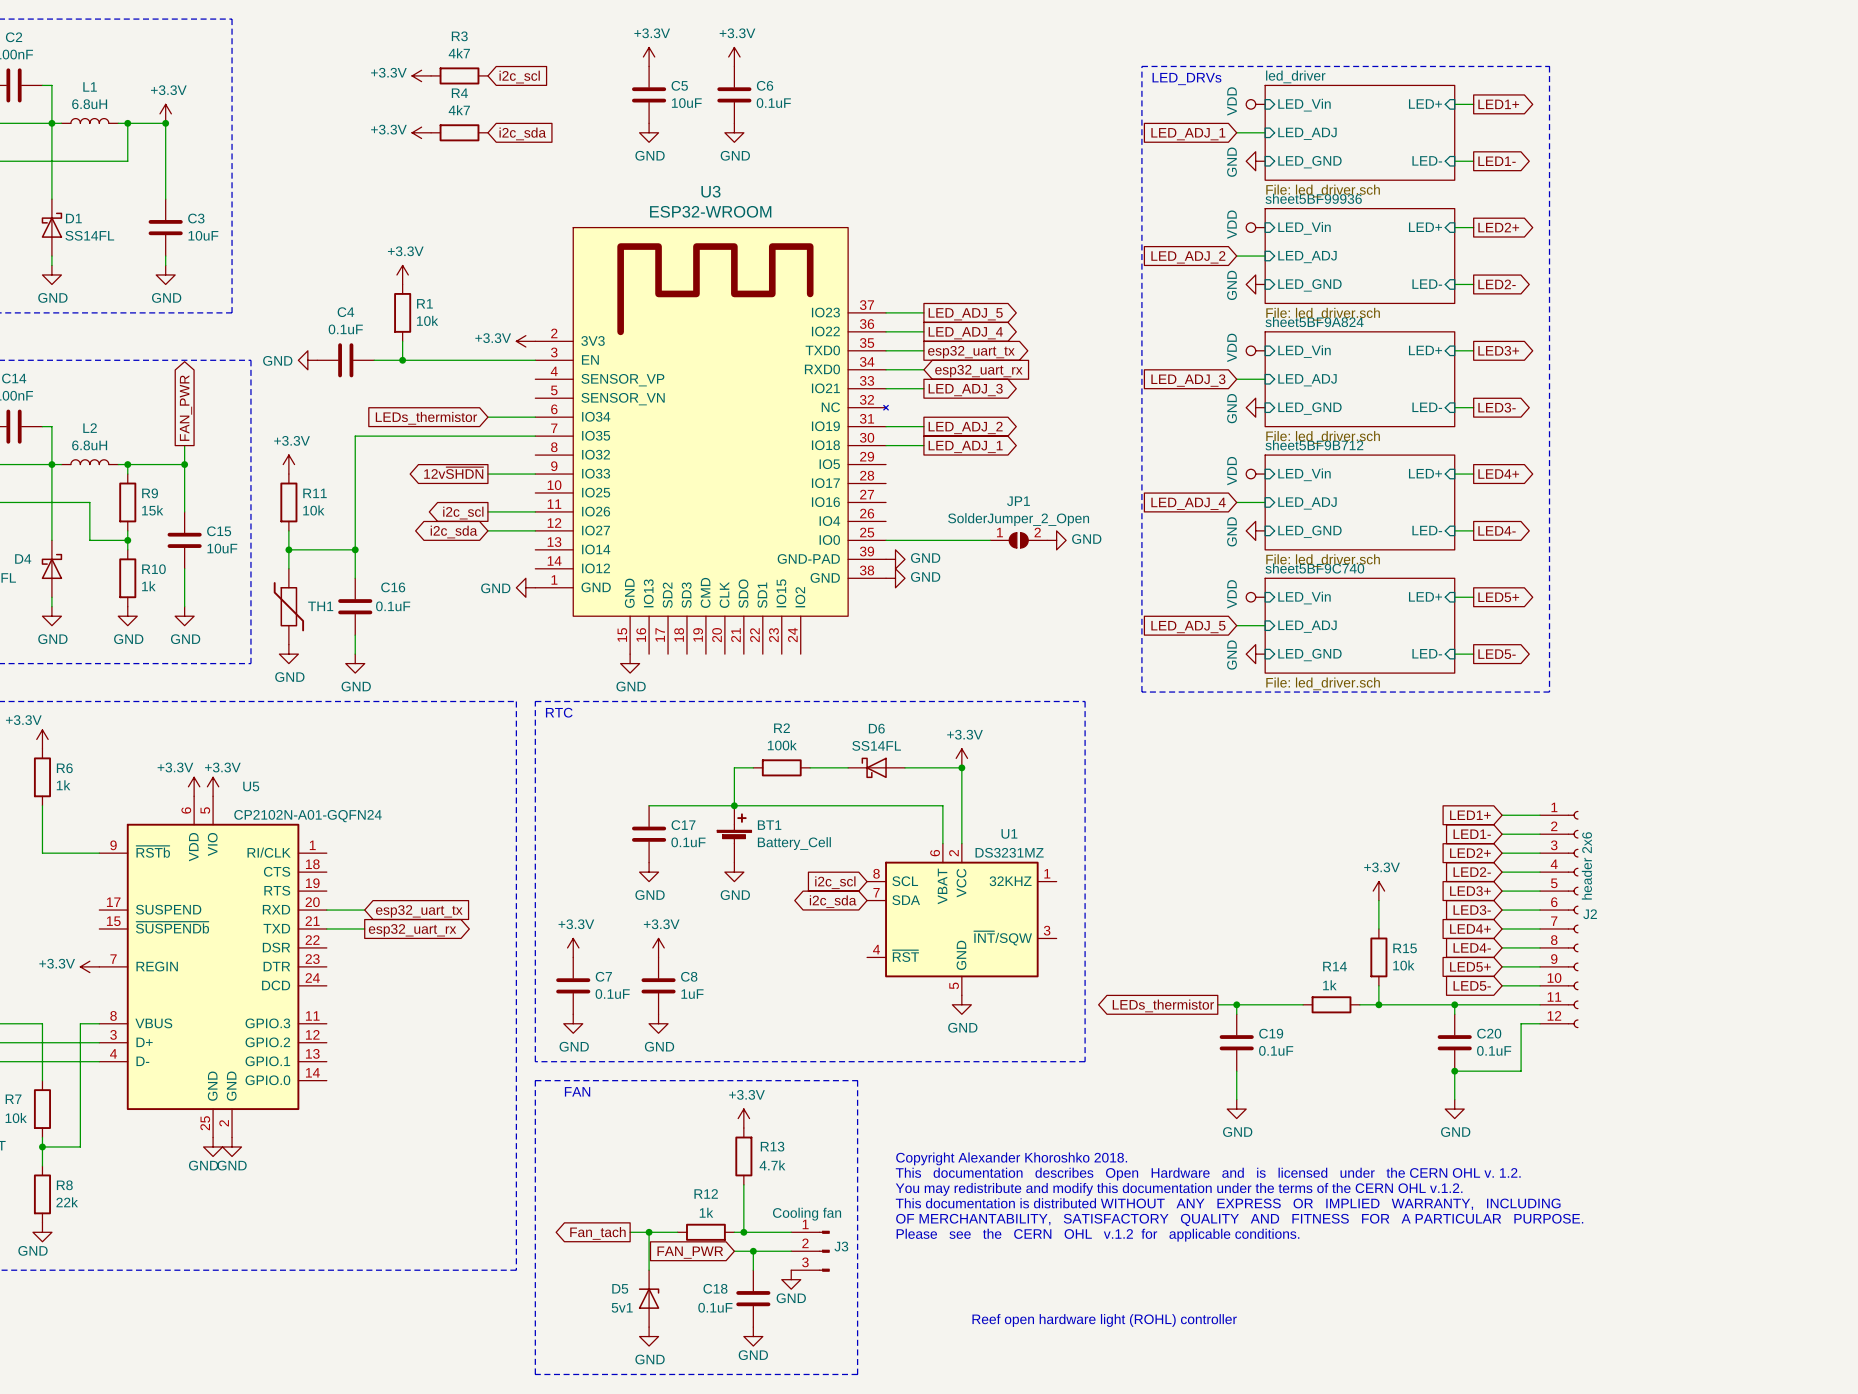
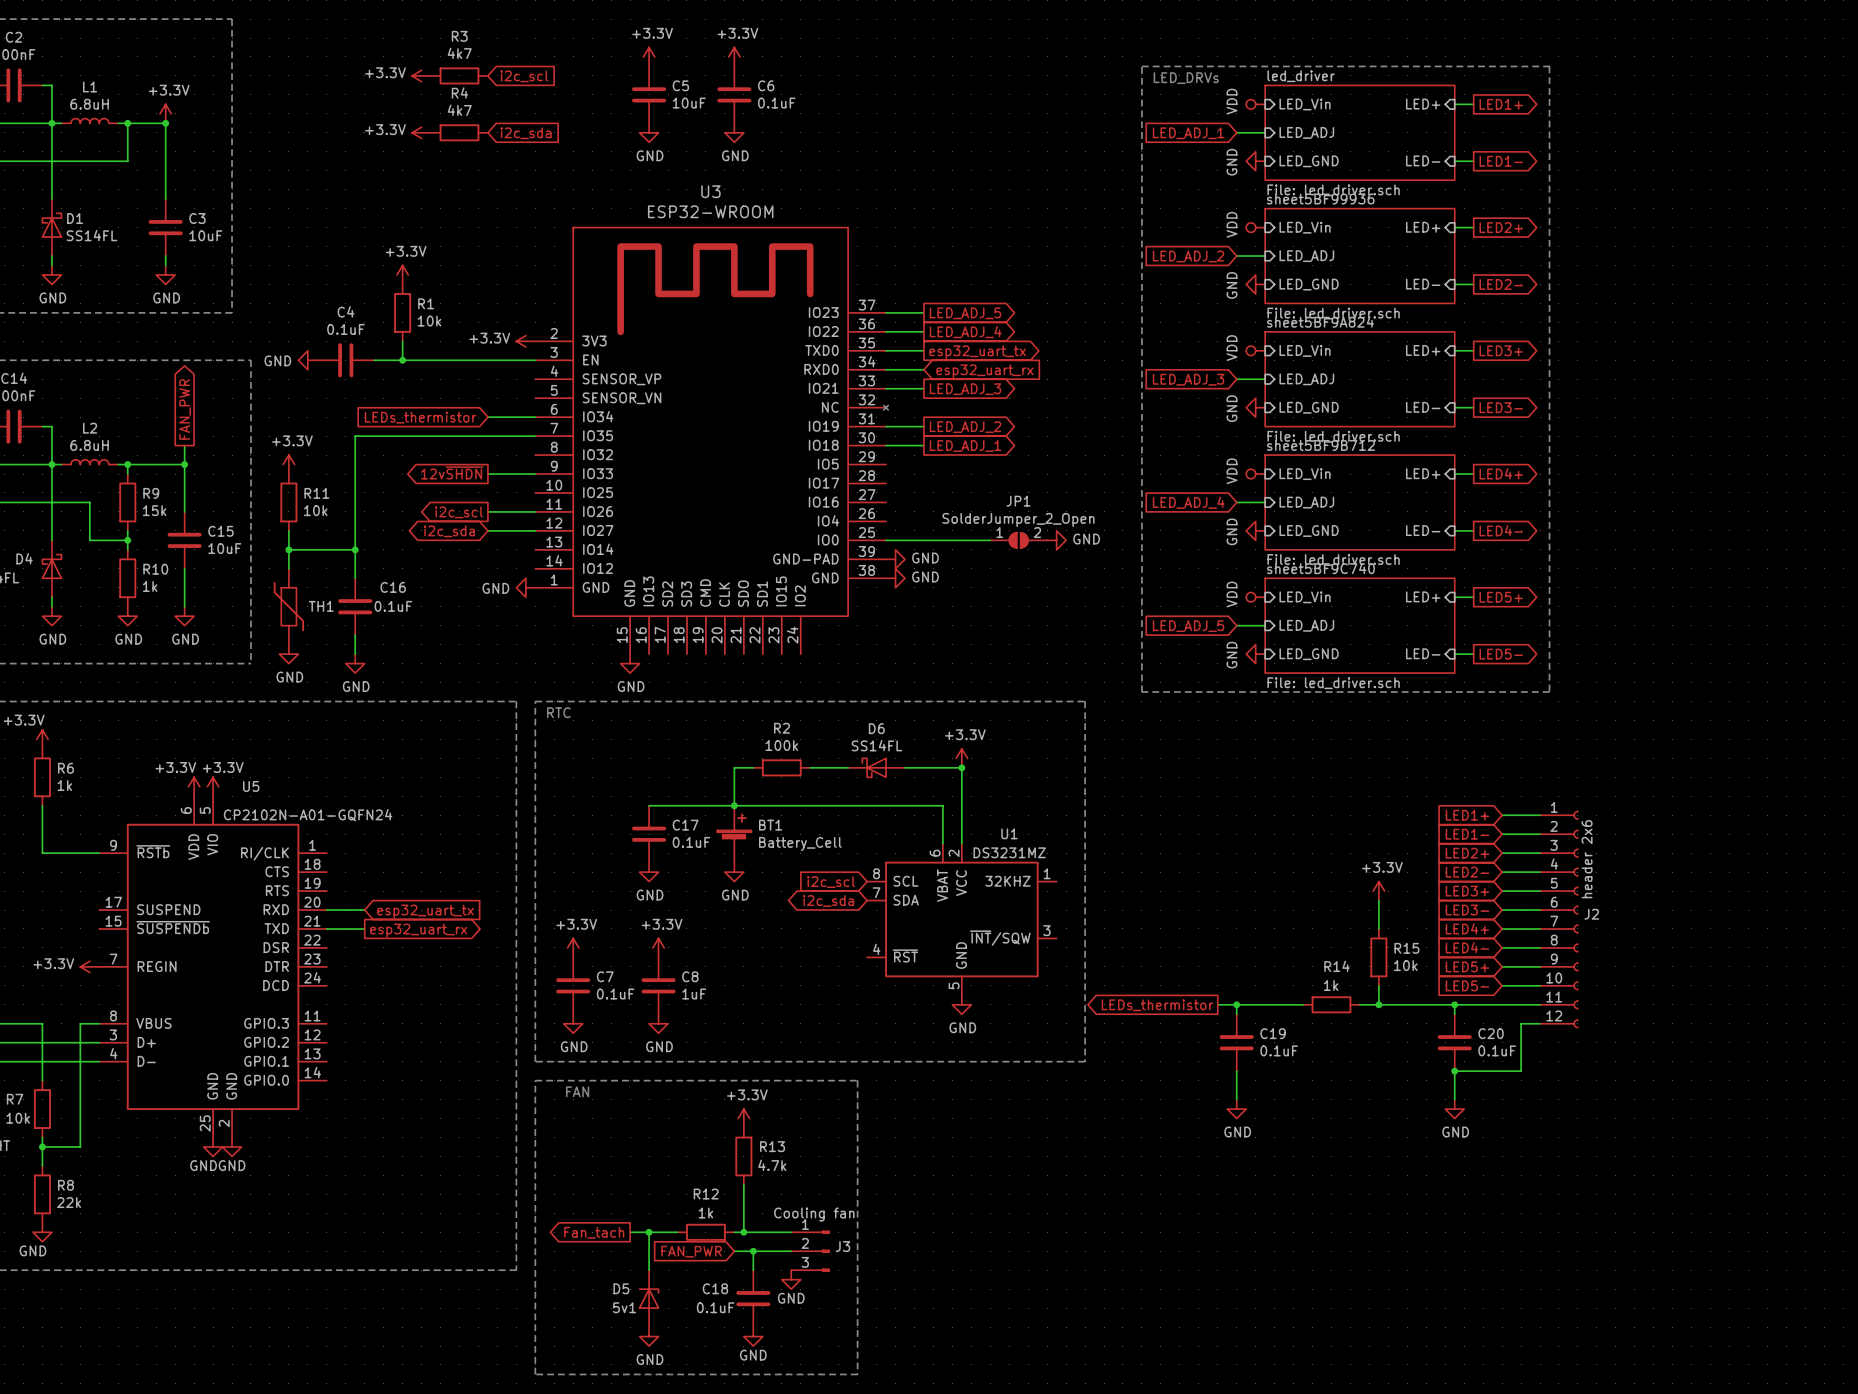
text: Copyright Alexander Khoroshko 2018. (1011, 1158) -> none
text: This documentation describes Open Hardware and is licensed under the CERN OHL v. 1.2. (1208, 1174) -> none
text: You may redistribute and modify this documentation under the terms of the CERN OHL v.1.2. (1179, 1189) -> none
text: This documentation is distributed WITHOUT ANY EXPRESS OR IMPLIED WARRANTY, INCLUDING (1228, 1204) -> none
text: OF MERCHANTABILITY, SATISFACTORY QUALITY AND FITNESS FOR A PARTICULAR PURPOSE. (1239, 1219) -> none
text: Please see the CERN OHL v.1.2 for applicable conditions. (1097, 1235) -> none
text: Reef open hardware light (ROHL) controller (1104, 1320) -> none

